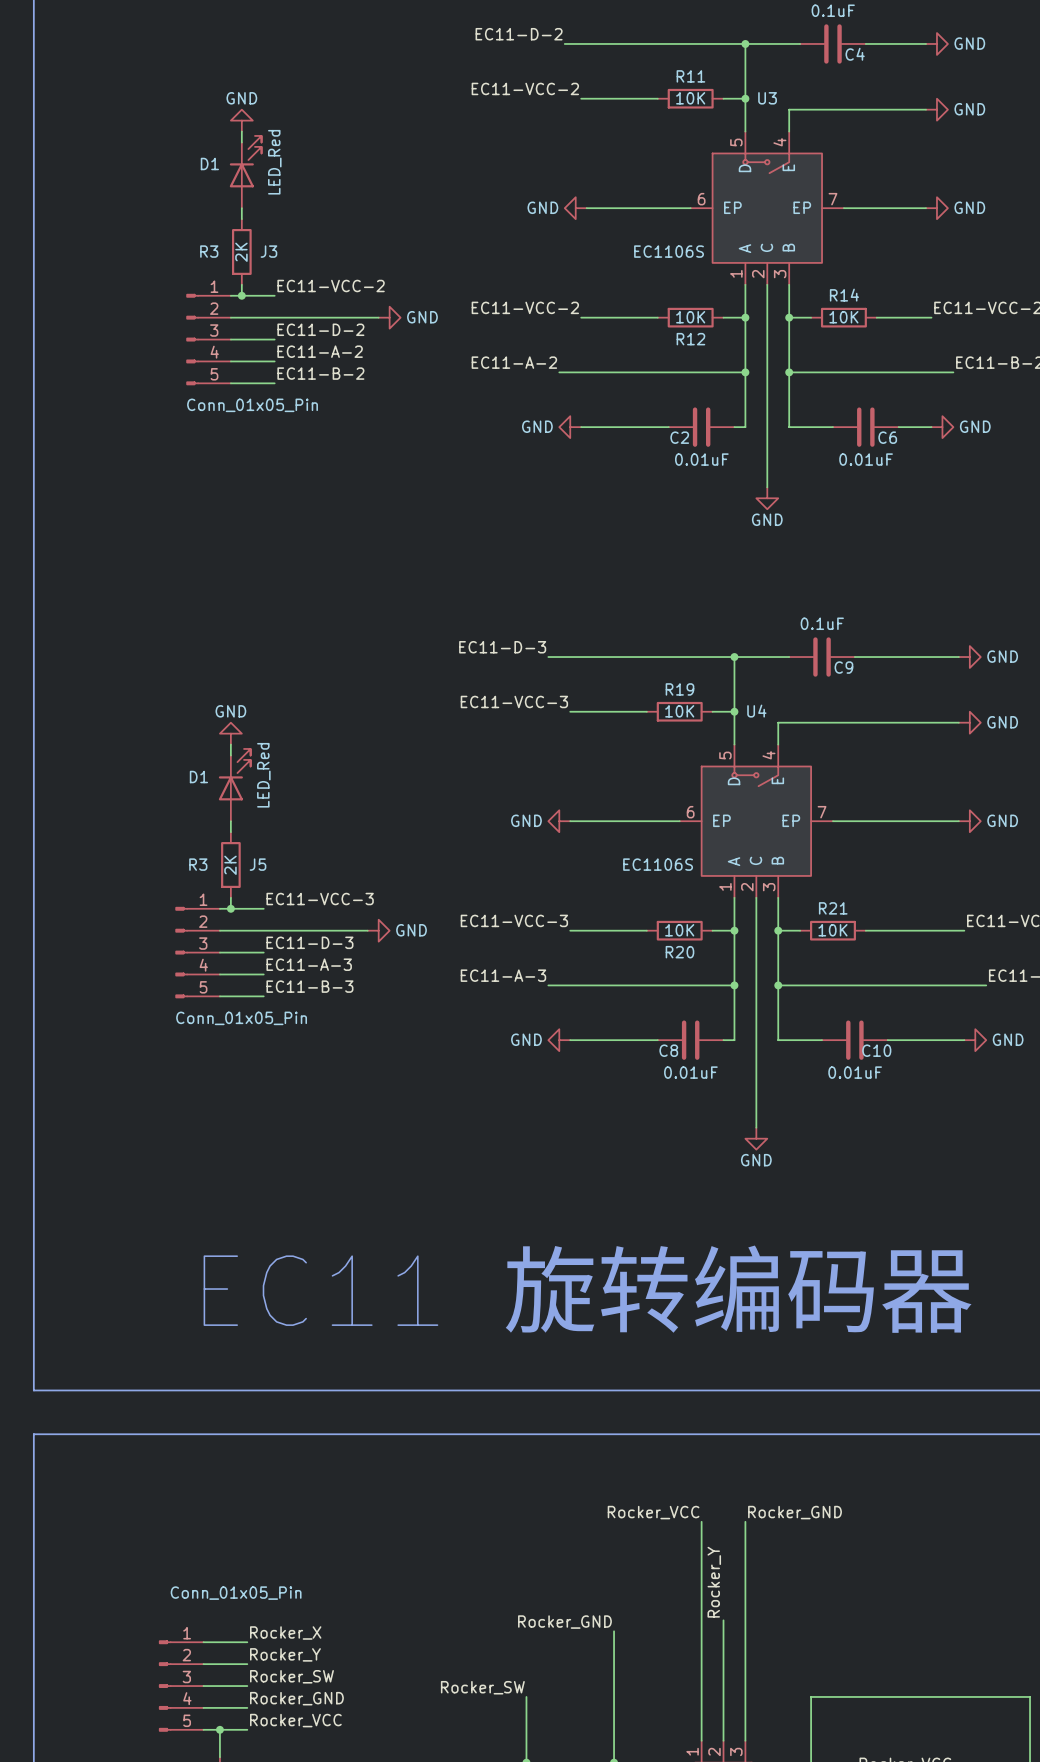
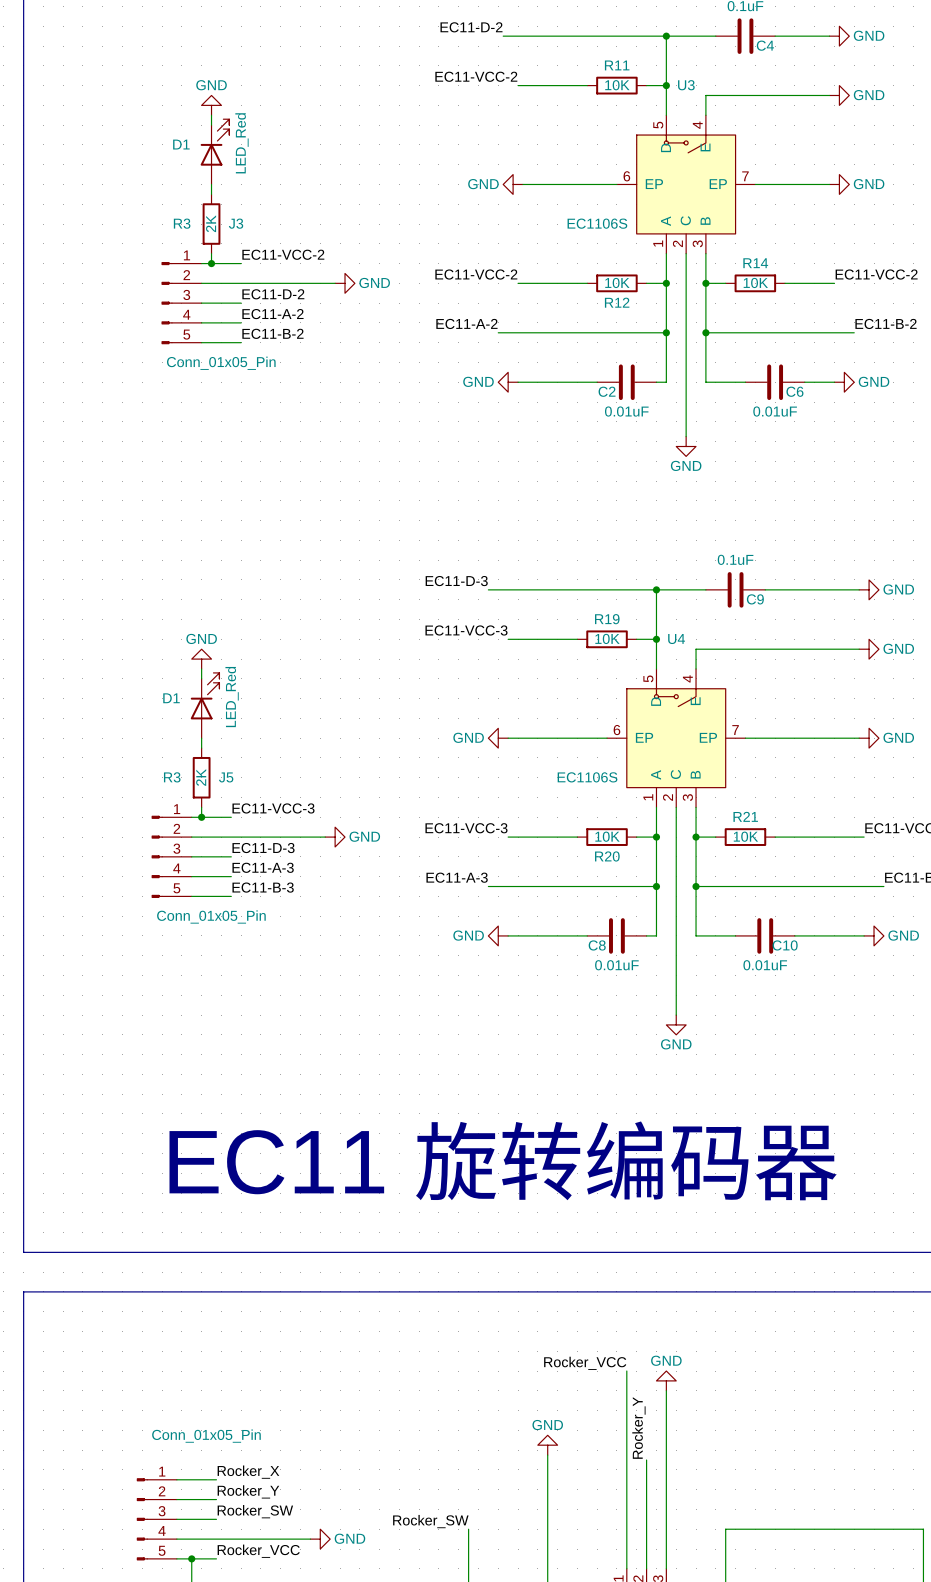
label: Rocker_GND (795, 1512) -> none
power symbol: none -> GND (666, 1380)
power symbol: none -> GND (547, 1445)
wire: none -> (547, 1455) (547, 1469)
label: Rocker_GND (564, 1622) -> none
label: Rocker_GND (296, 1698) -> none
wire: none -> (216, 1539) (310, 1539)
power symbol: none -> GND (320, 1539)

